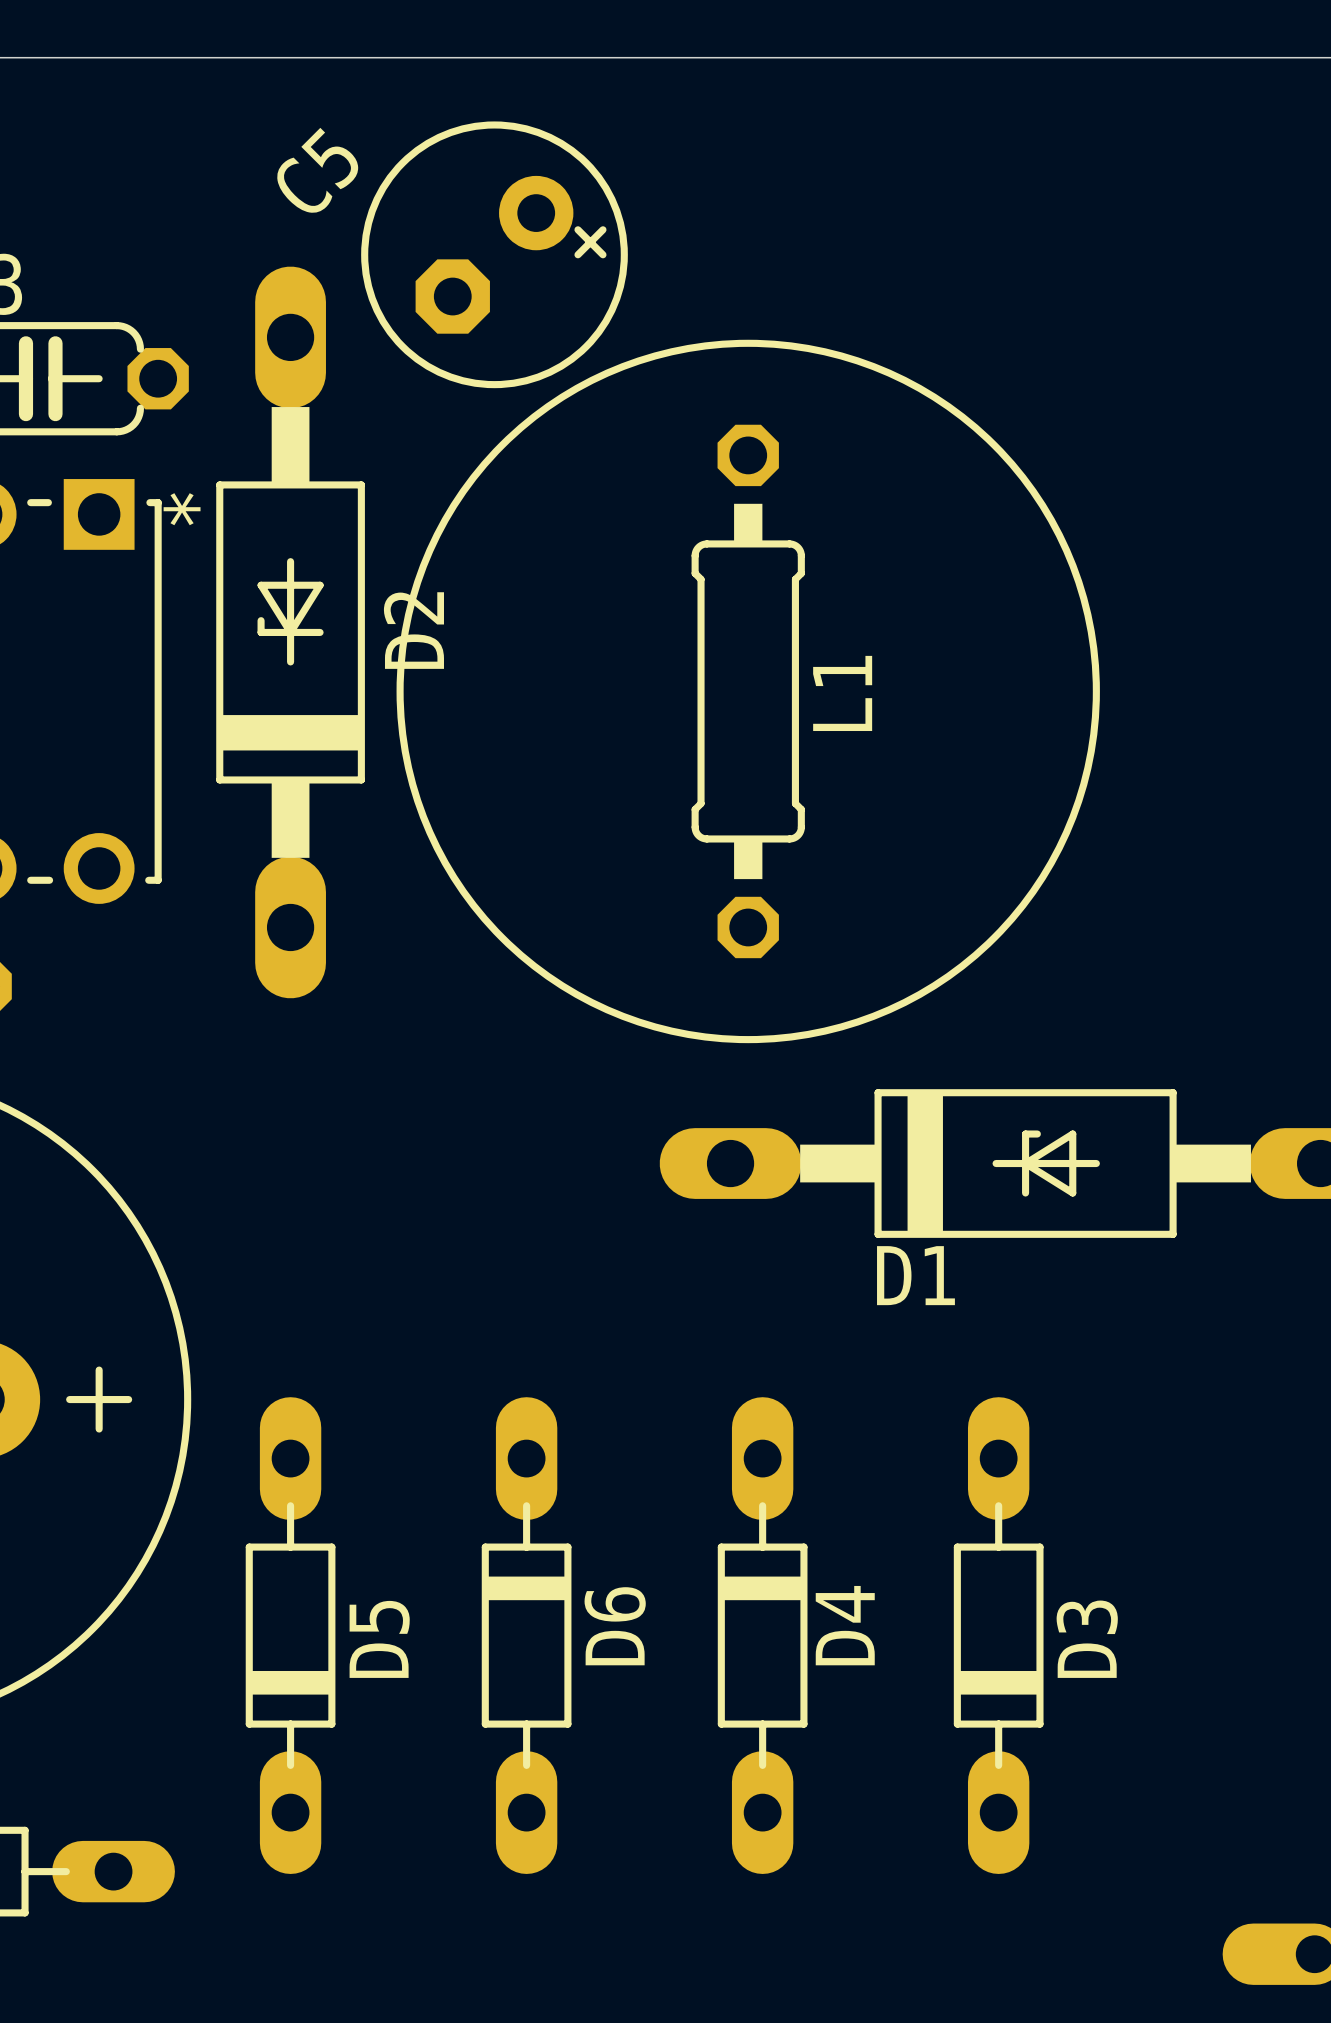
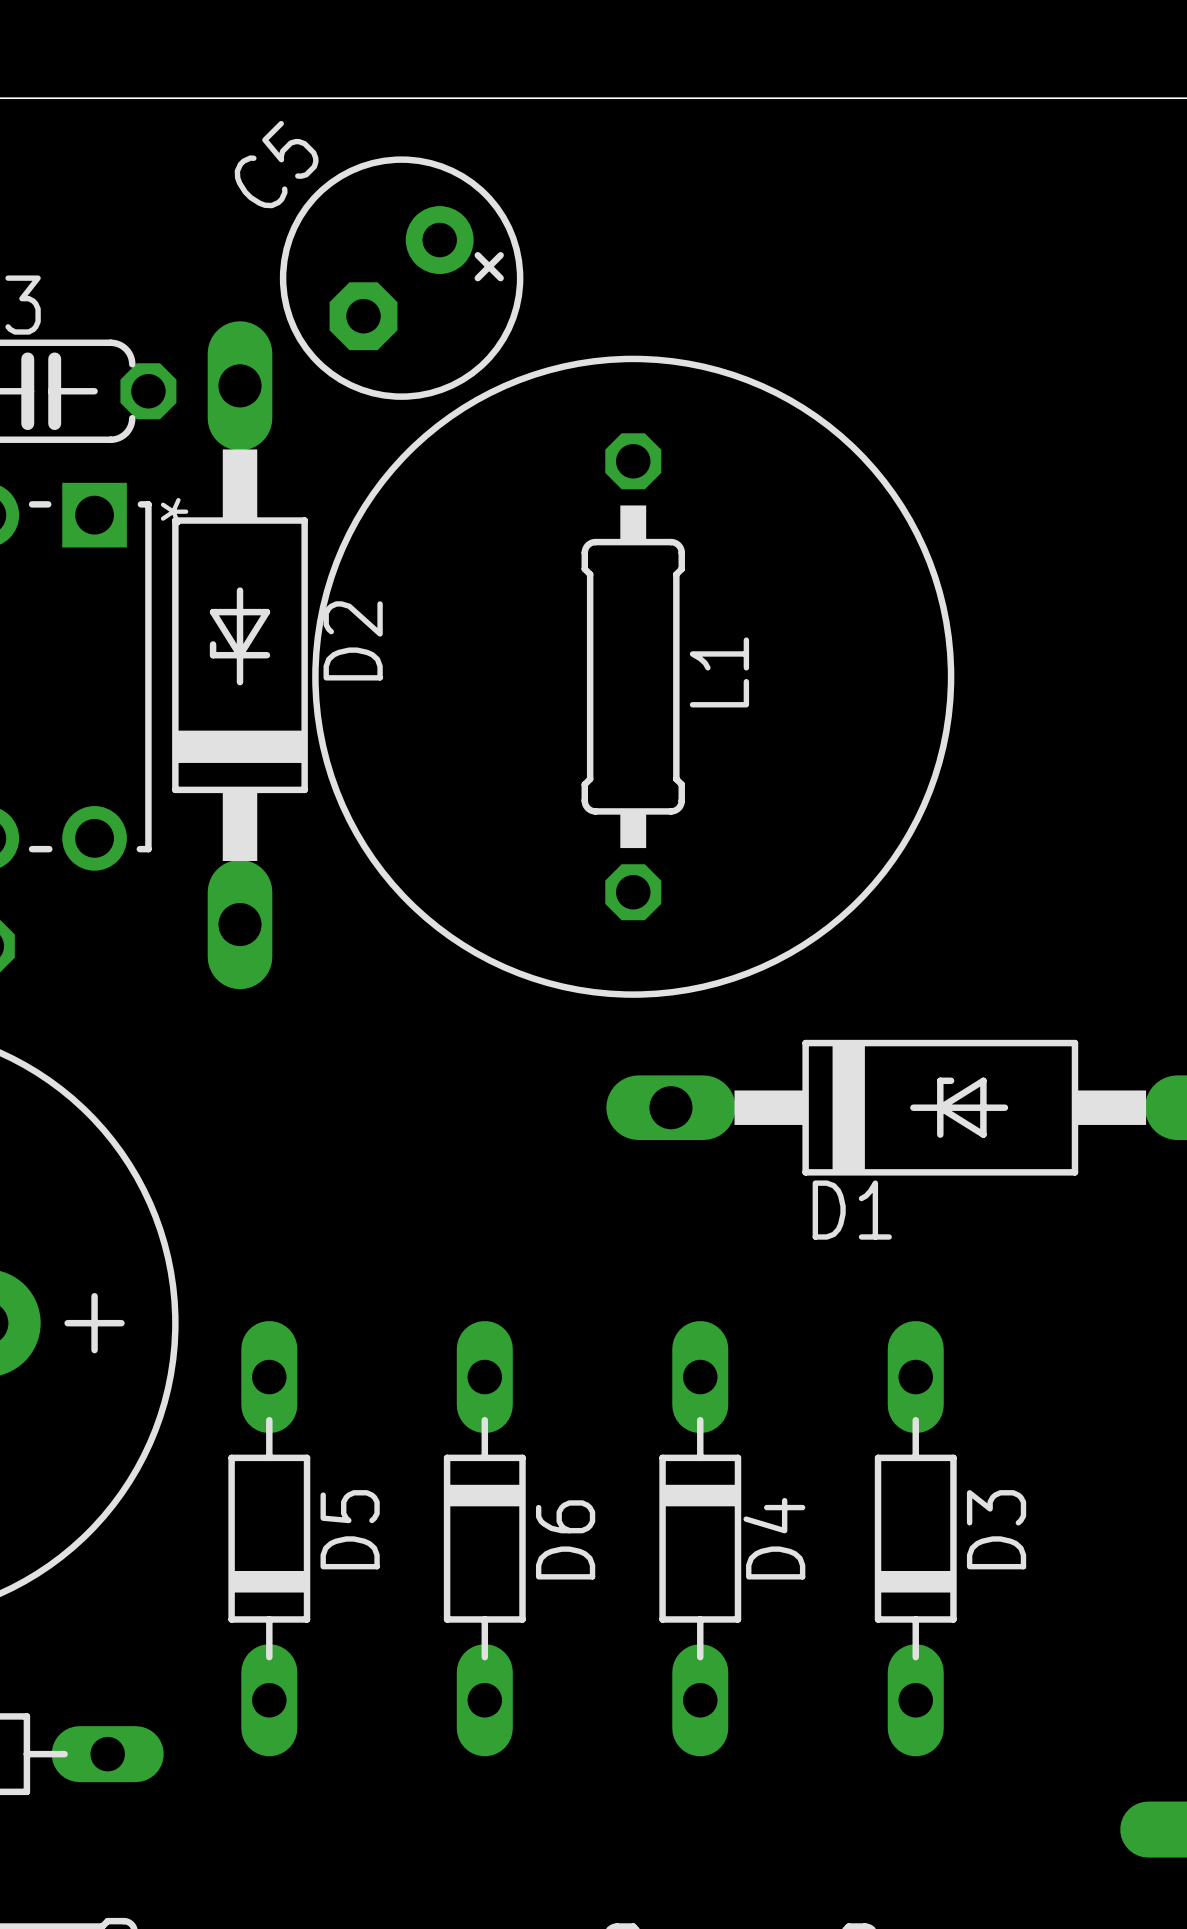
C5 name position: C5 (317, 170) -> C5 (276, 164)
C5 position: (494, 254) -> (401, 278)
D2 position: (290, 632) -> (240, 655)
drawing position: (748, 691) -> (633, 676)
L1 position: (748, 691) -> (633, 676)

